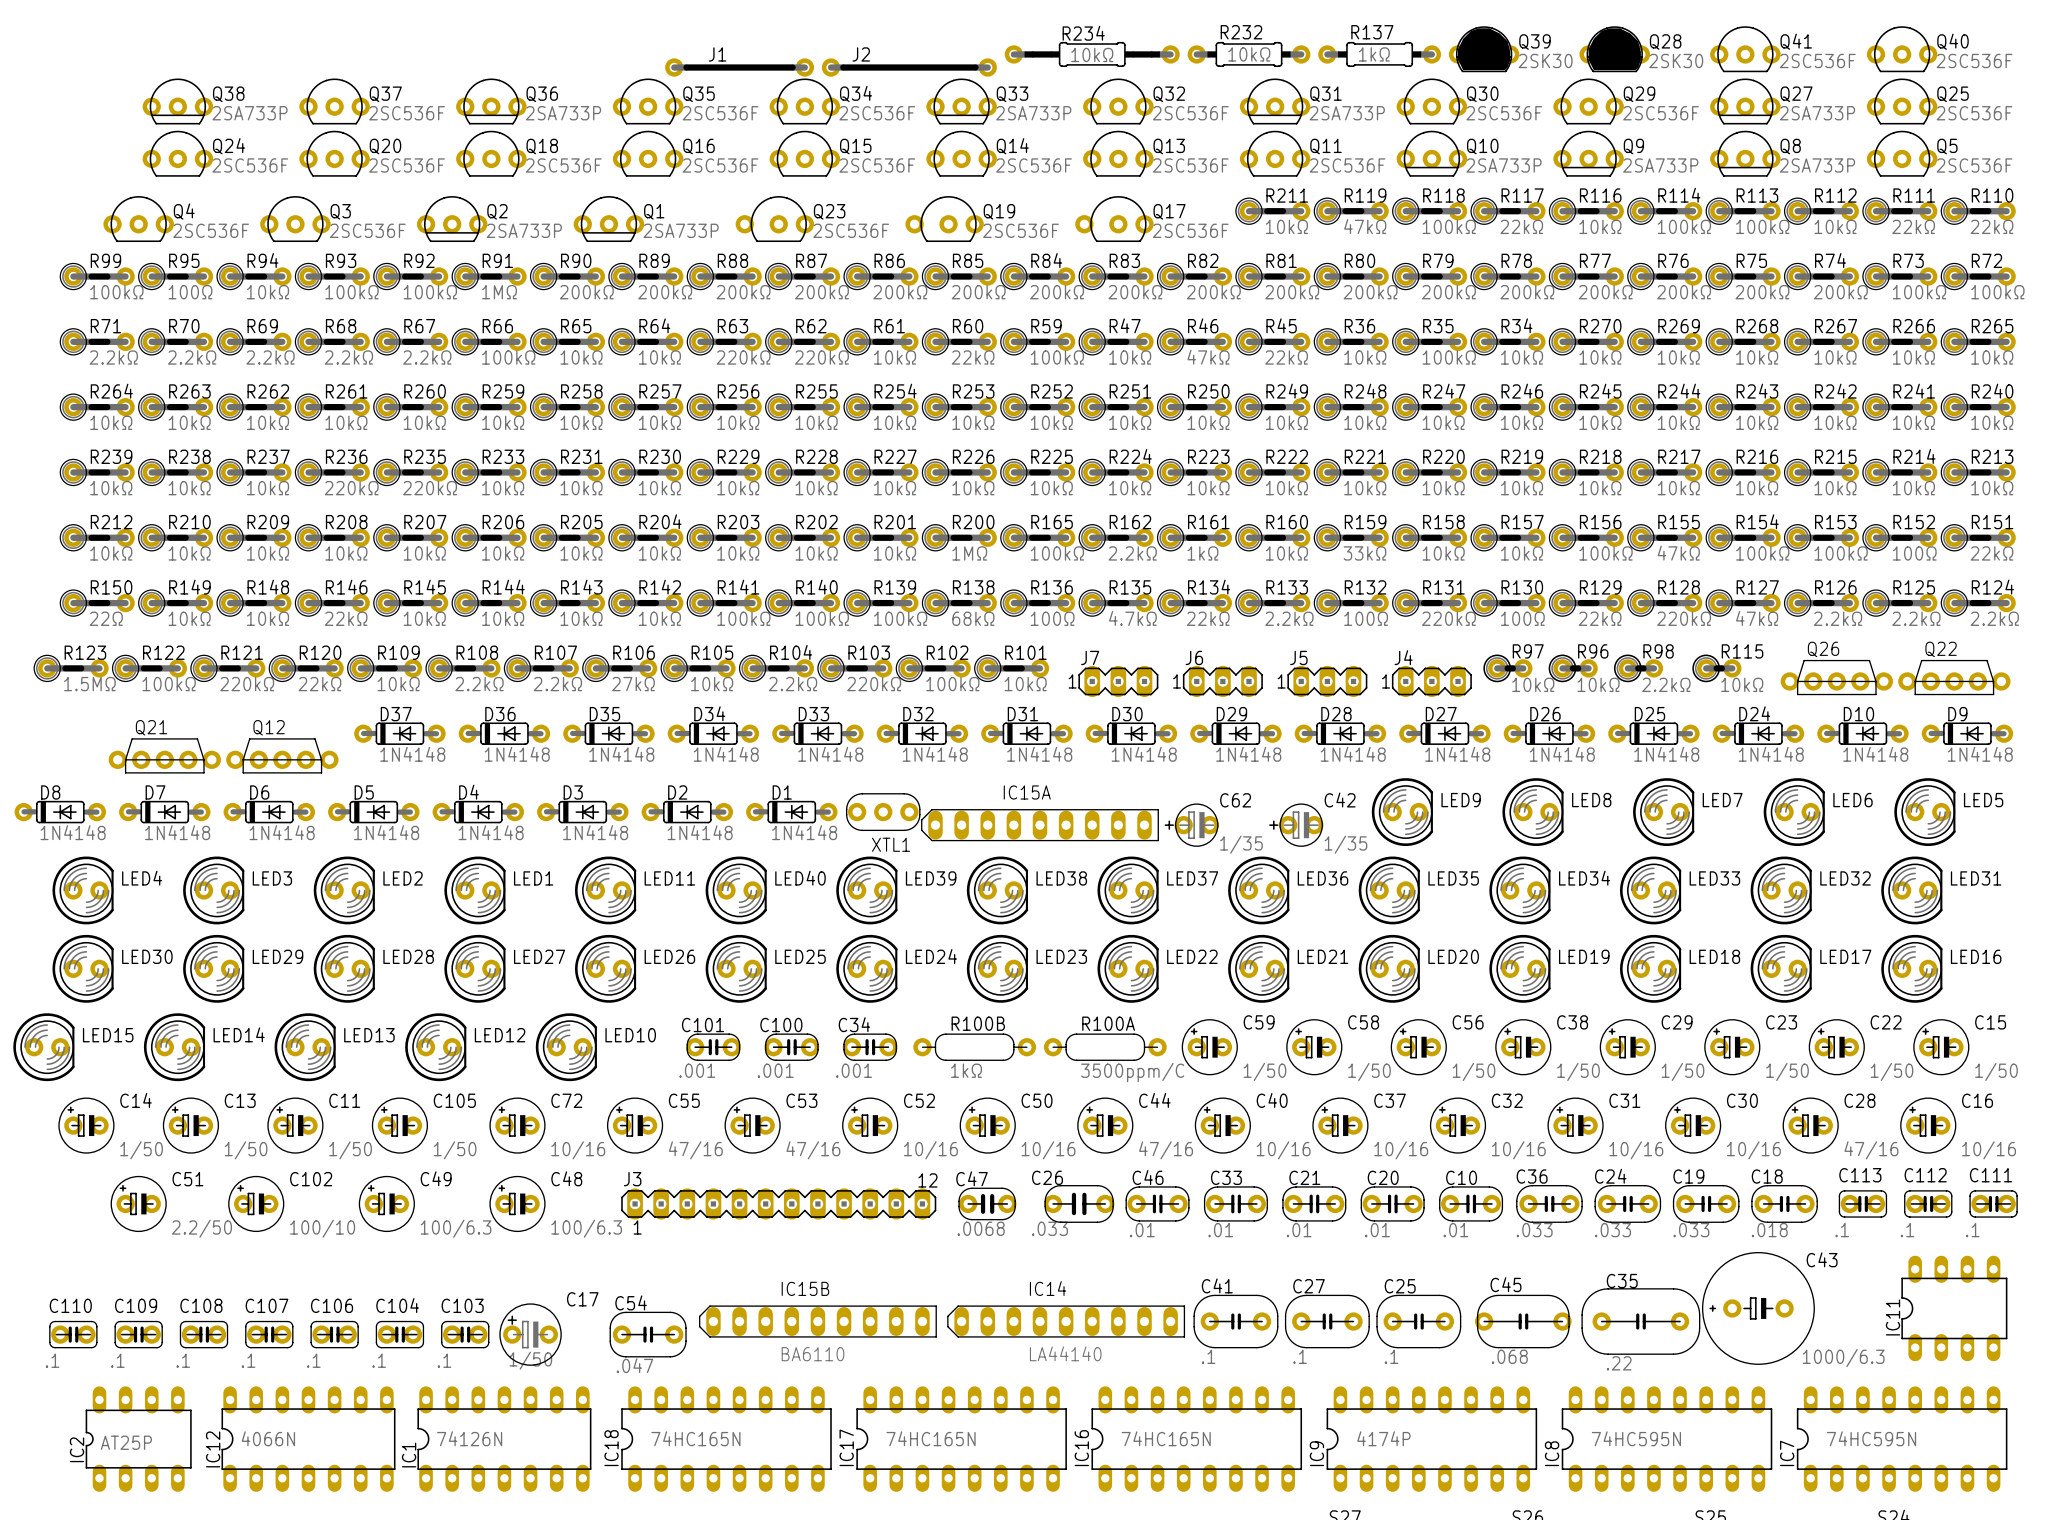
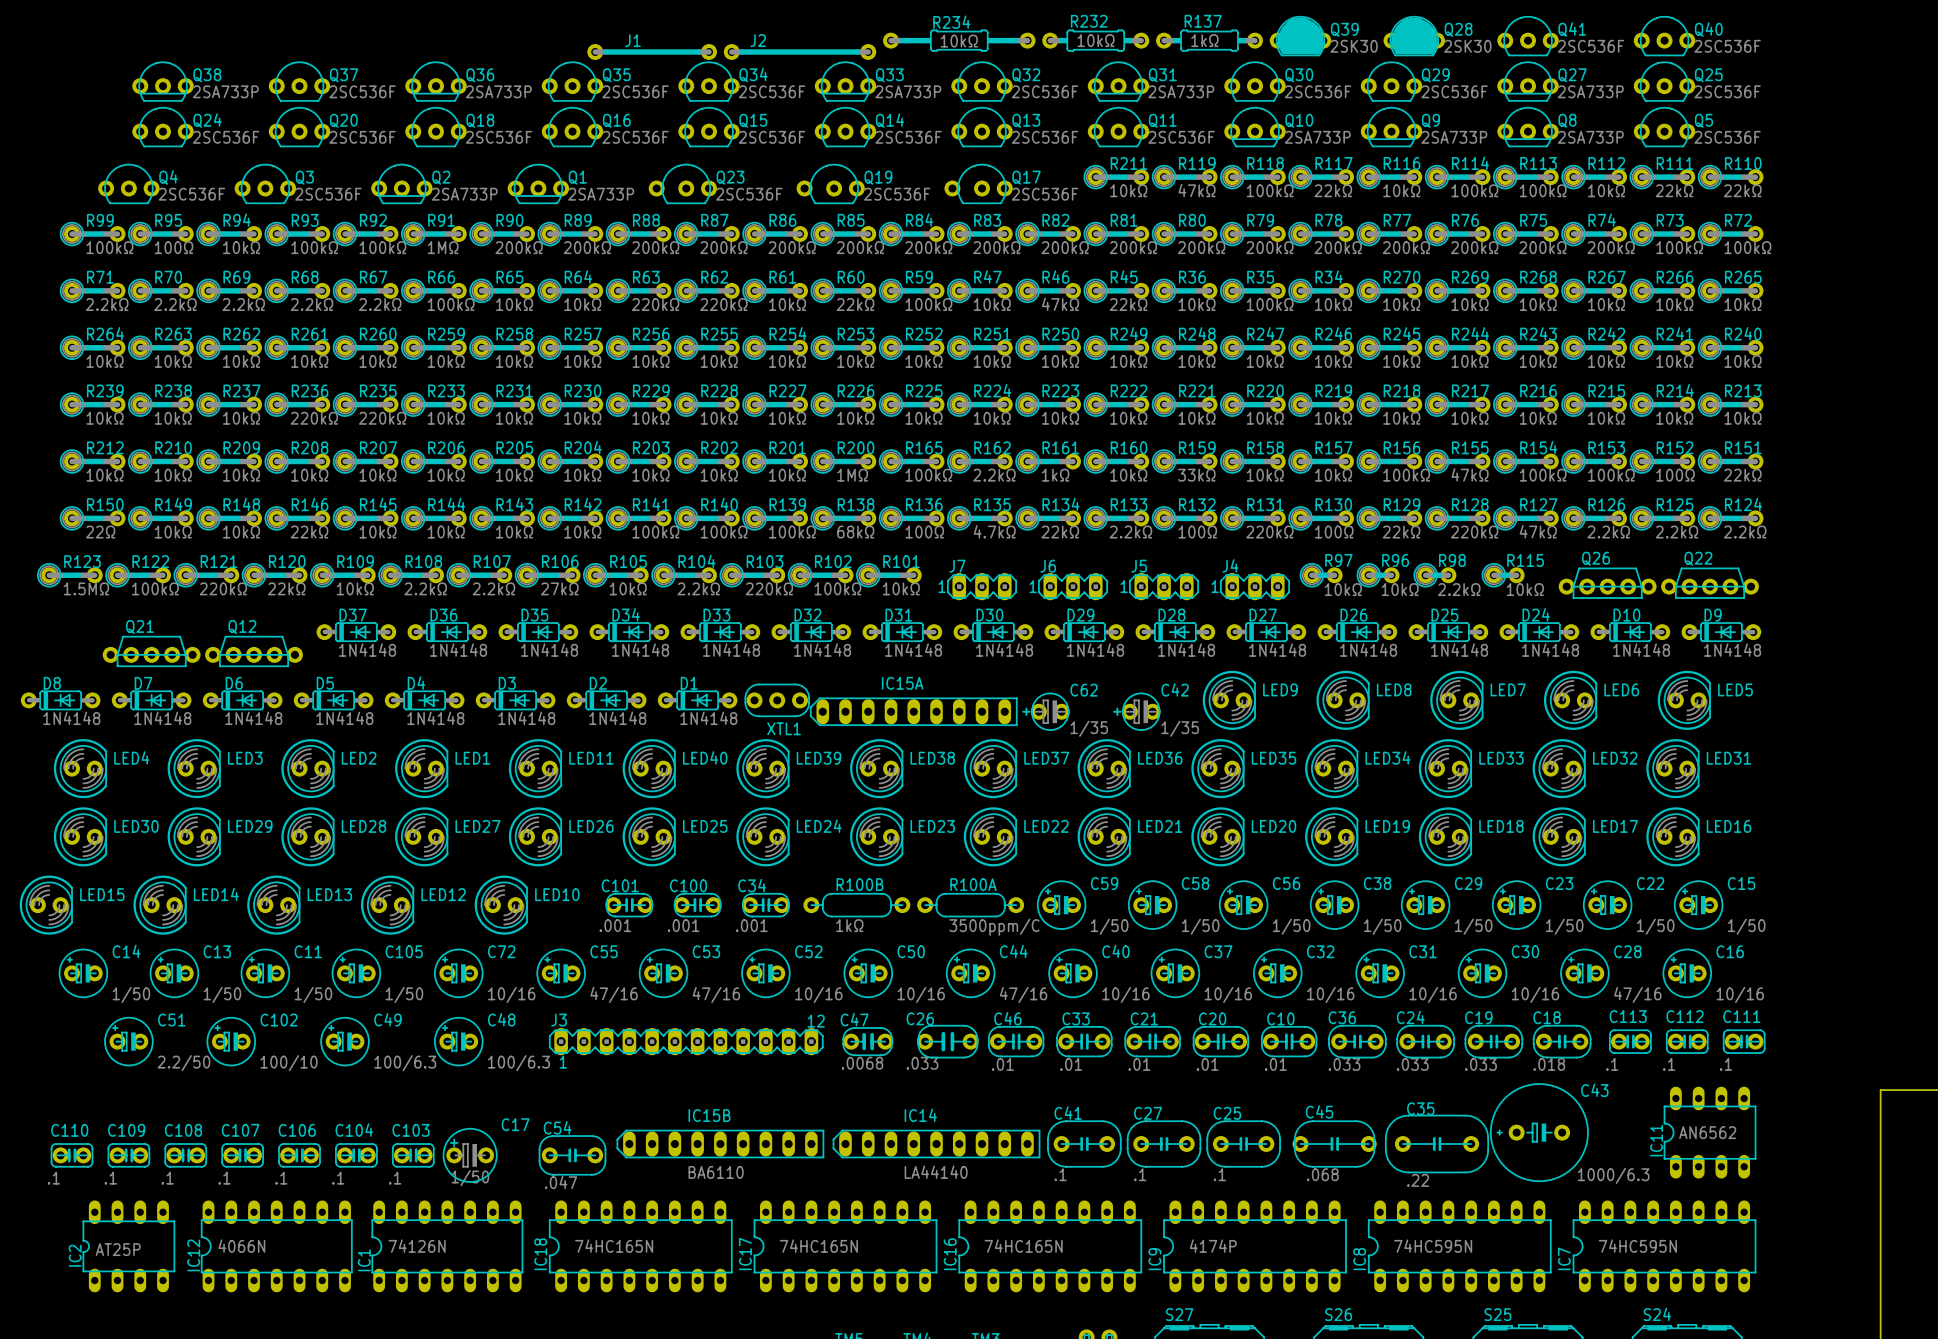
IC11 value: none -> AN6562 (1707, 1132)

